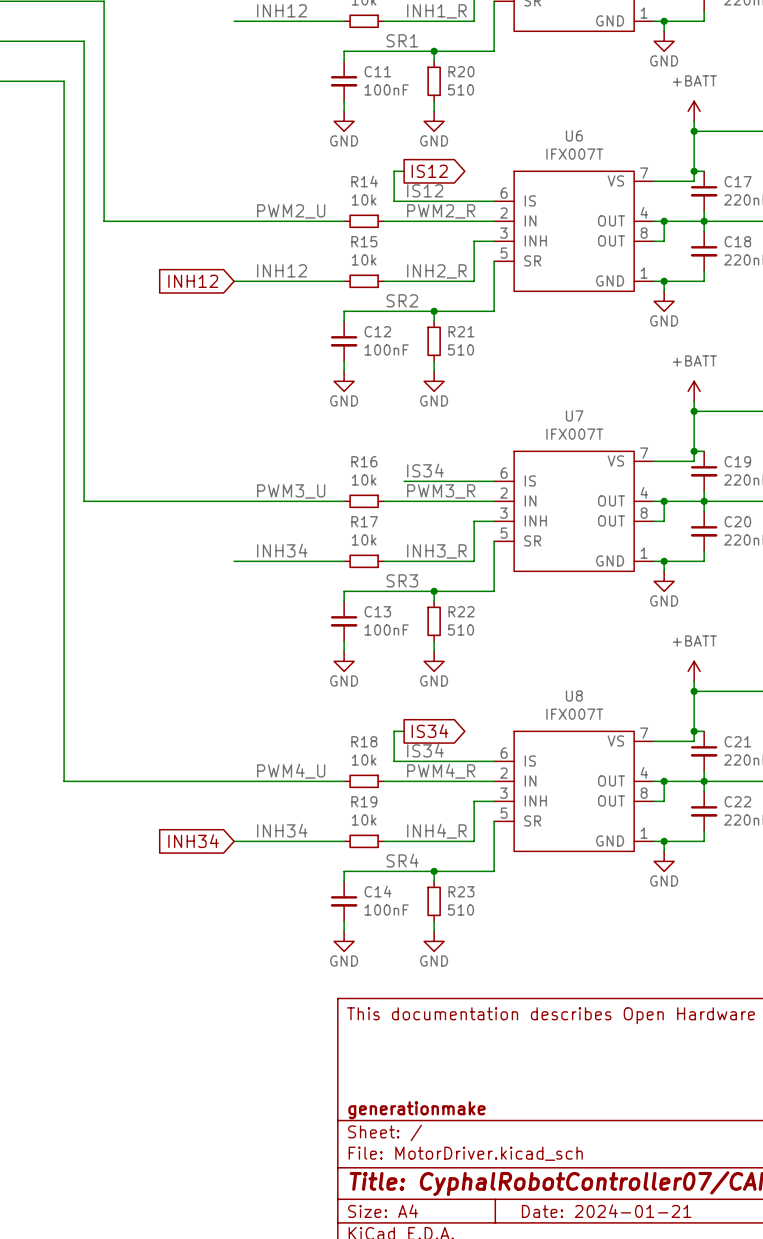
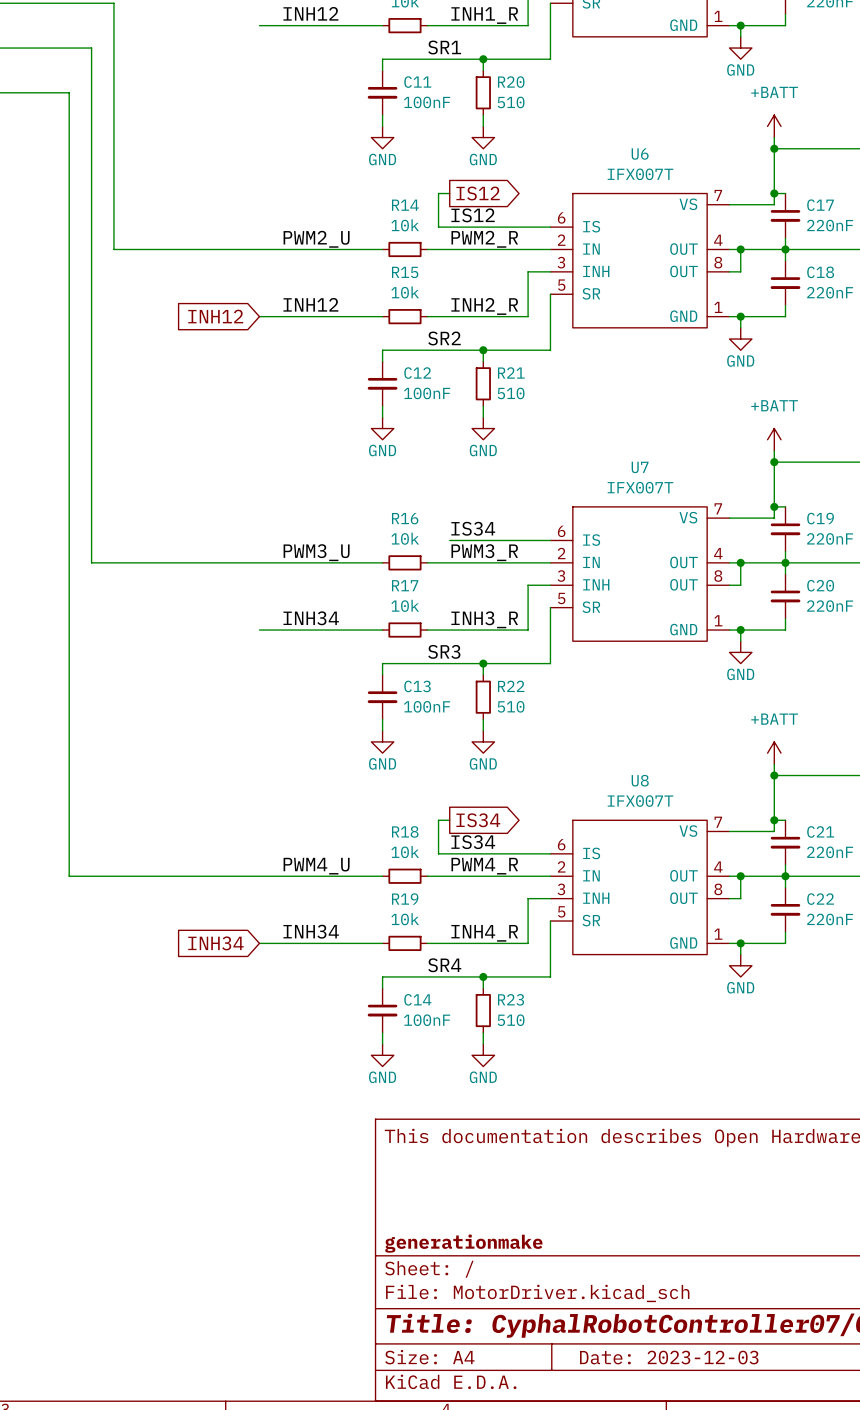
title block: Date: 2024-01-21 (606, 1211) -> Date: 2023-12-03 (669, 1357)

